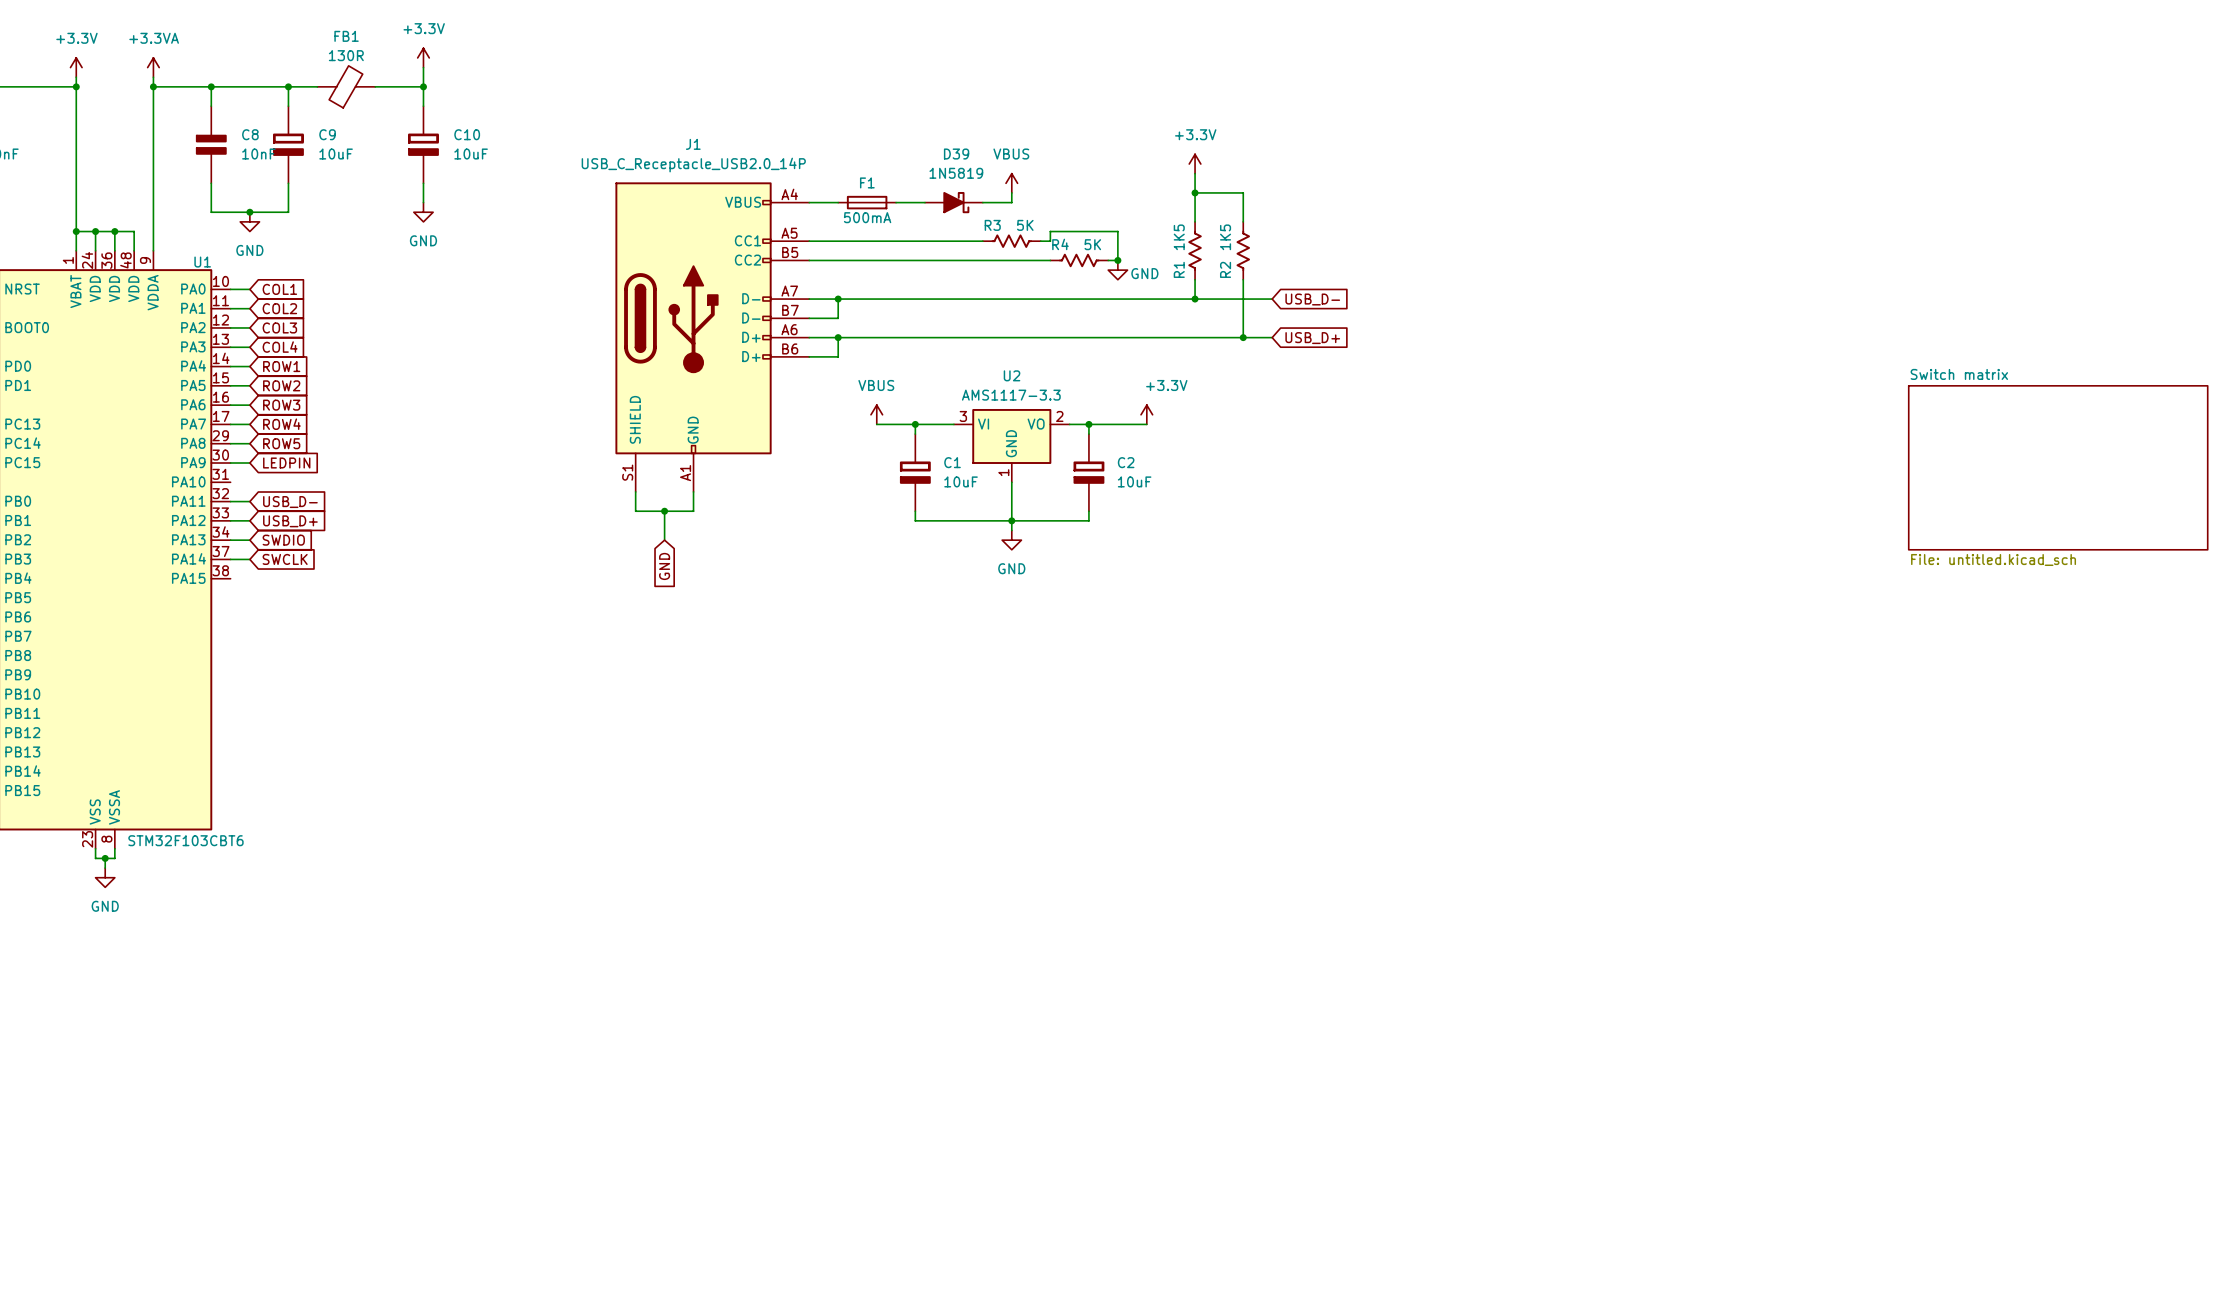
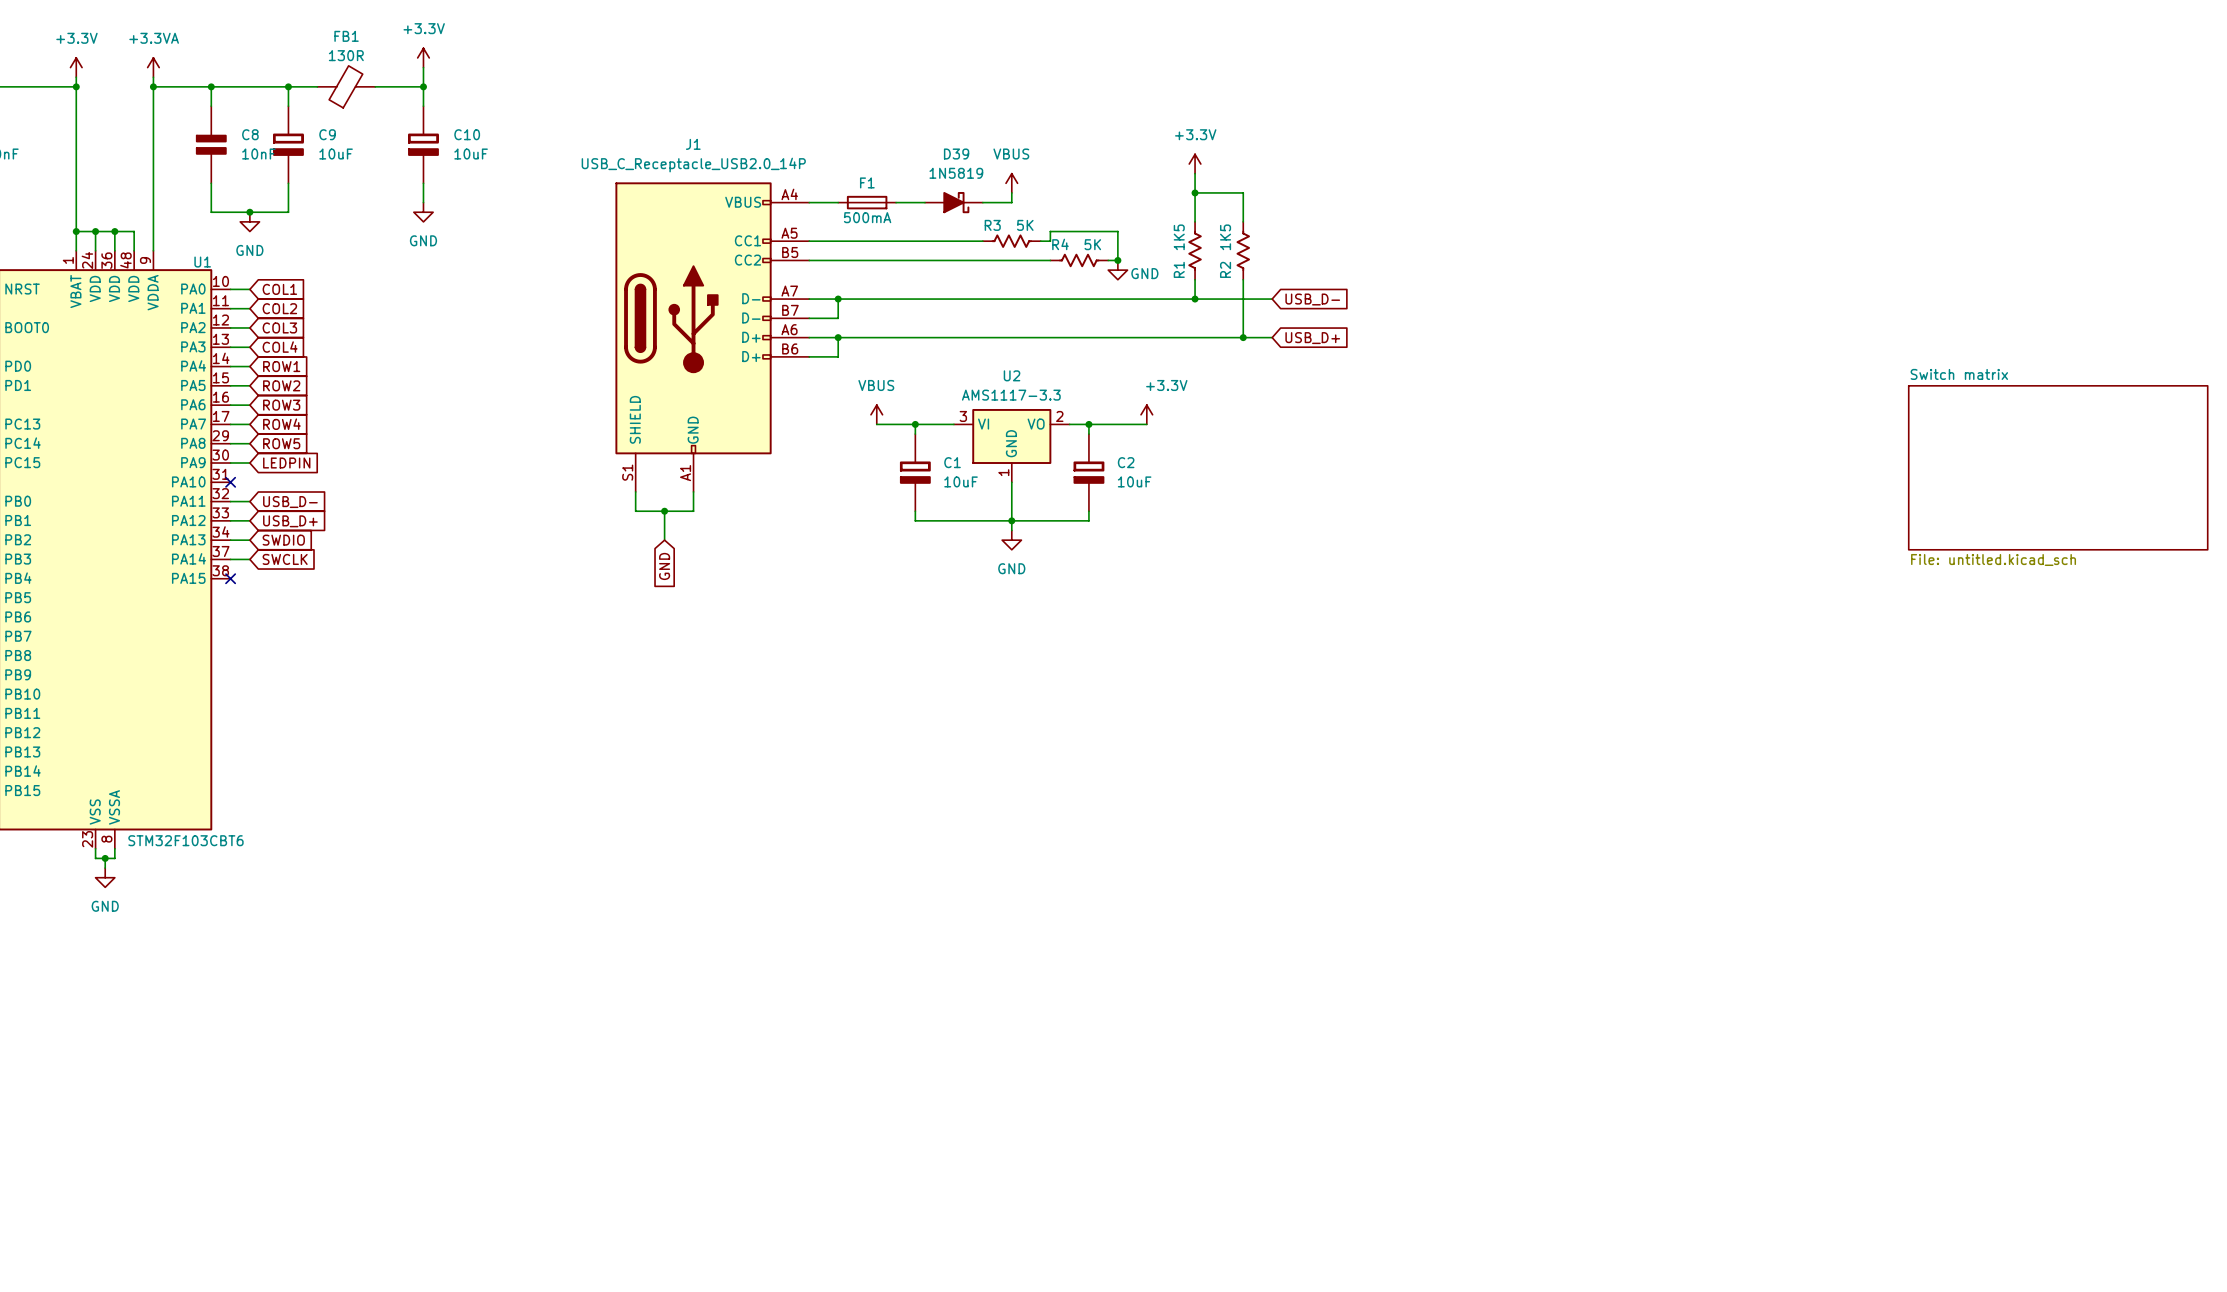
no-connect mark: none -> (230, 482)
no-connect mark: none -> (230, 578)

